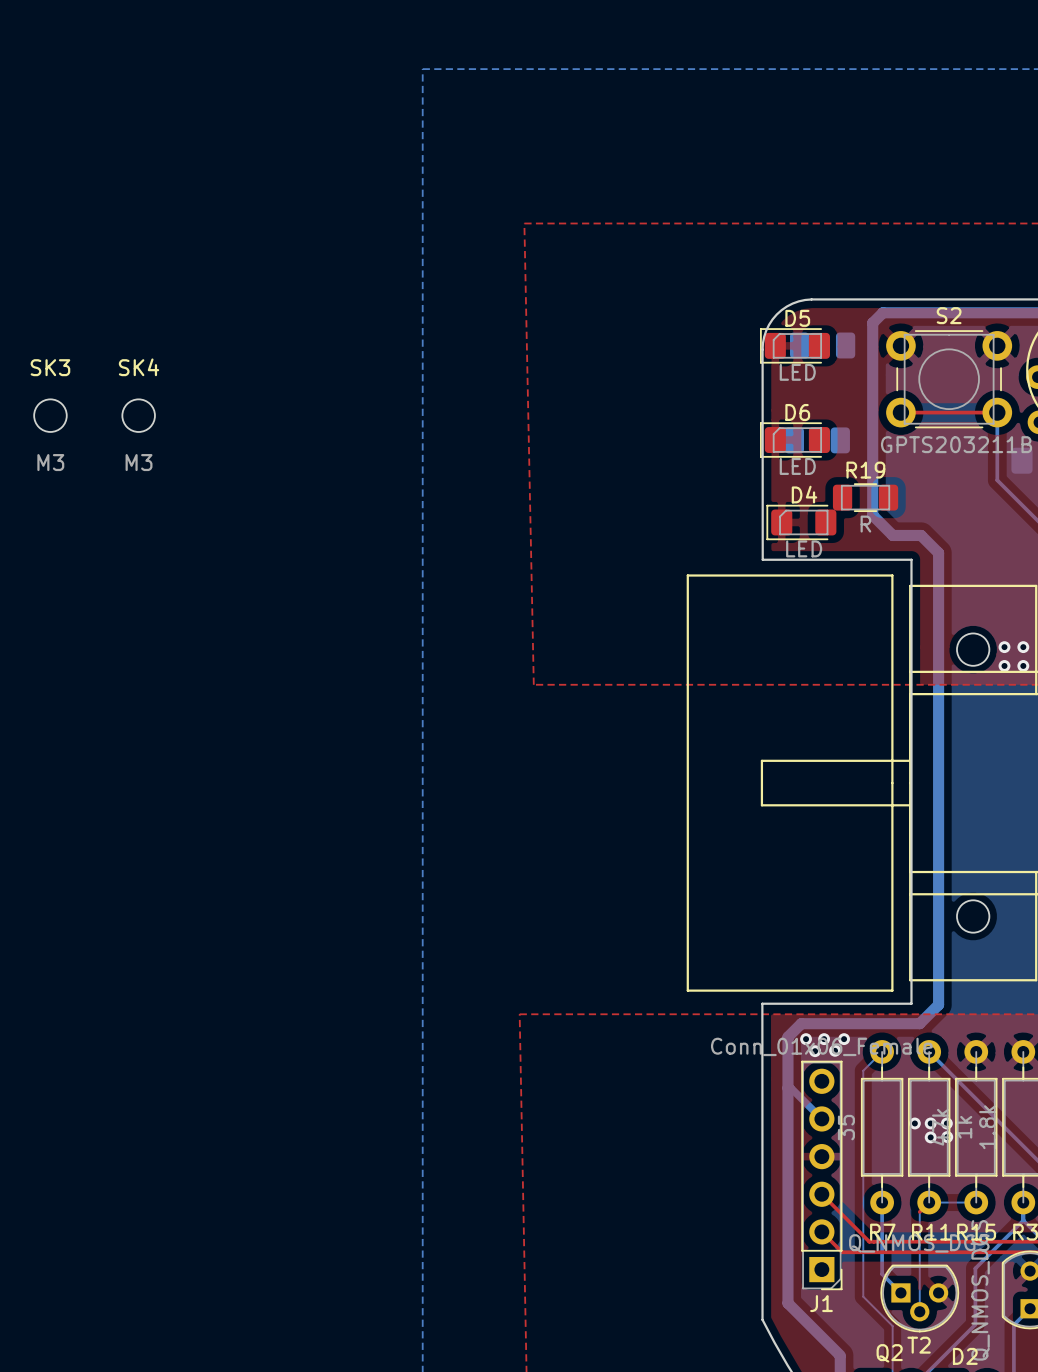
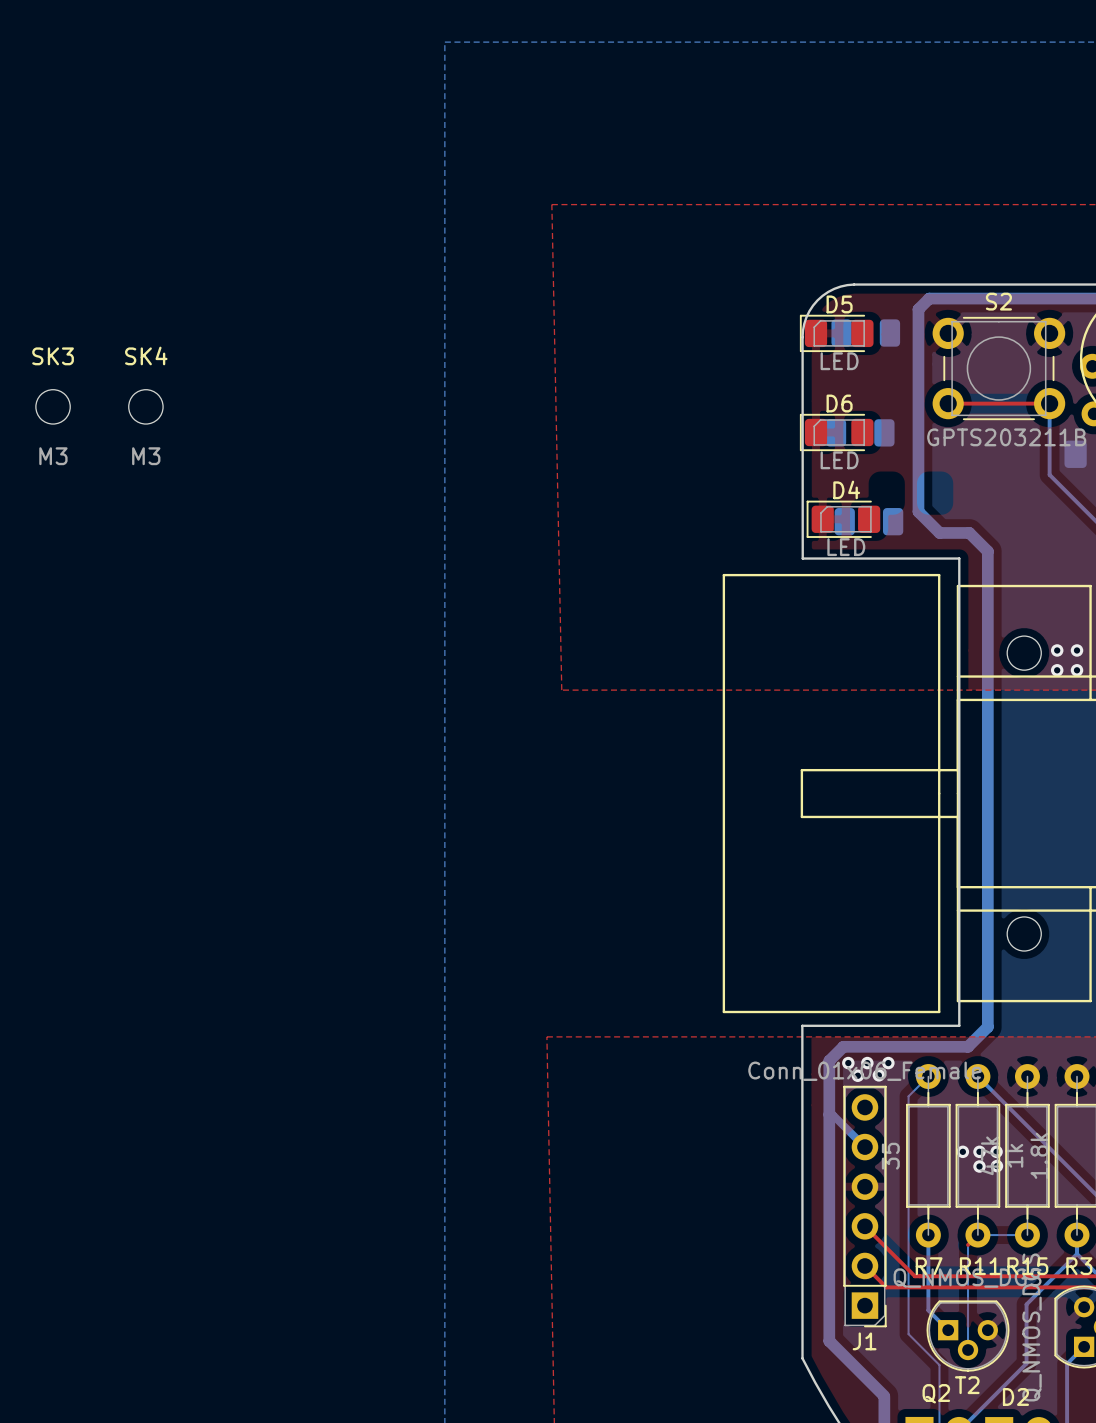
R19 side: top (865, 497) -> bottom (868, 521)

